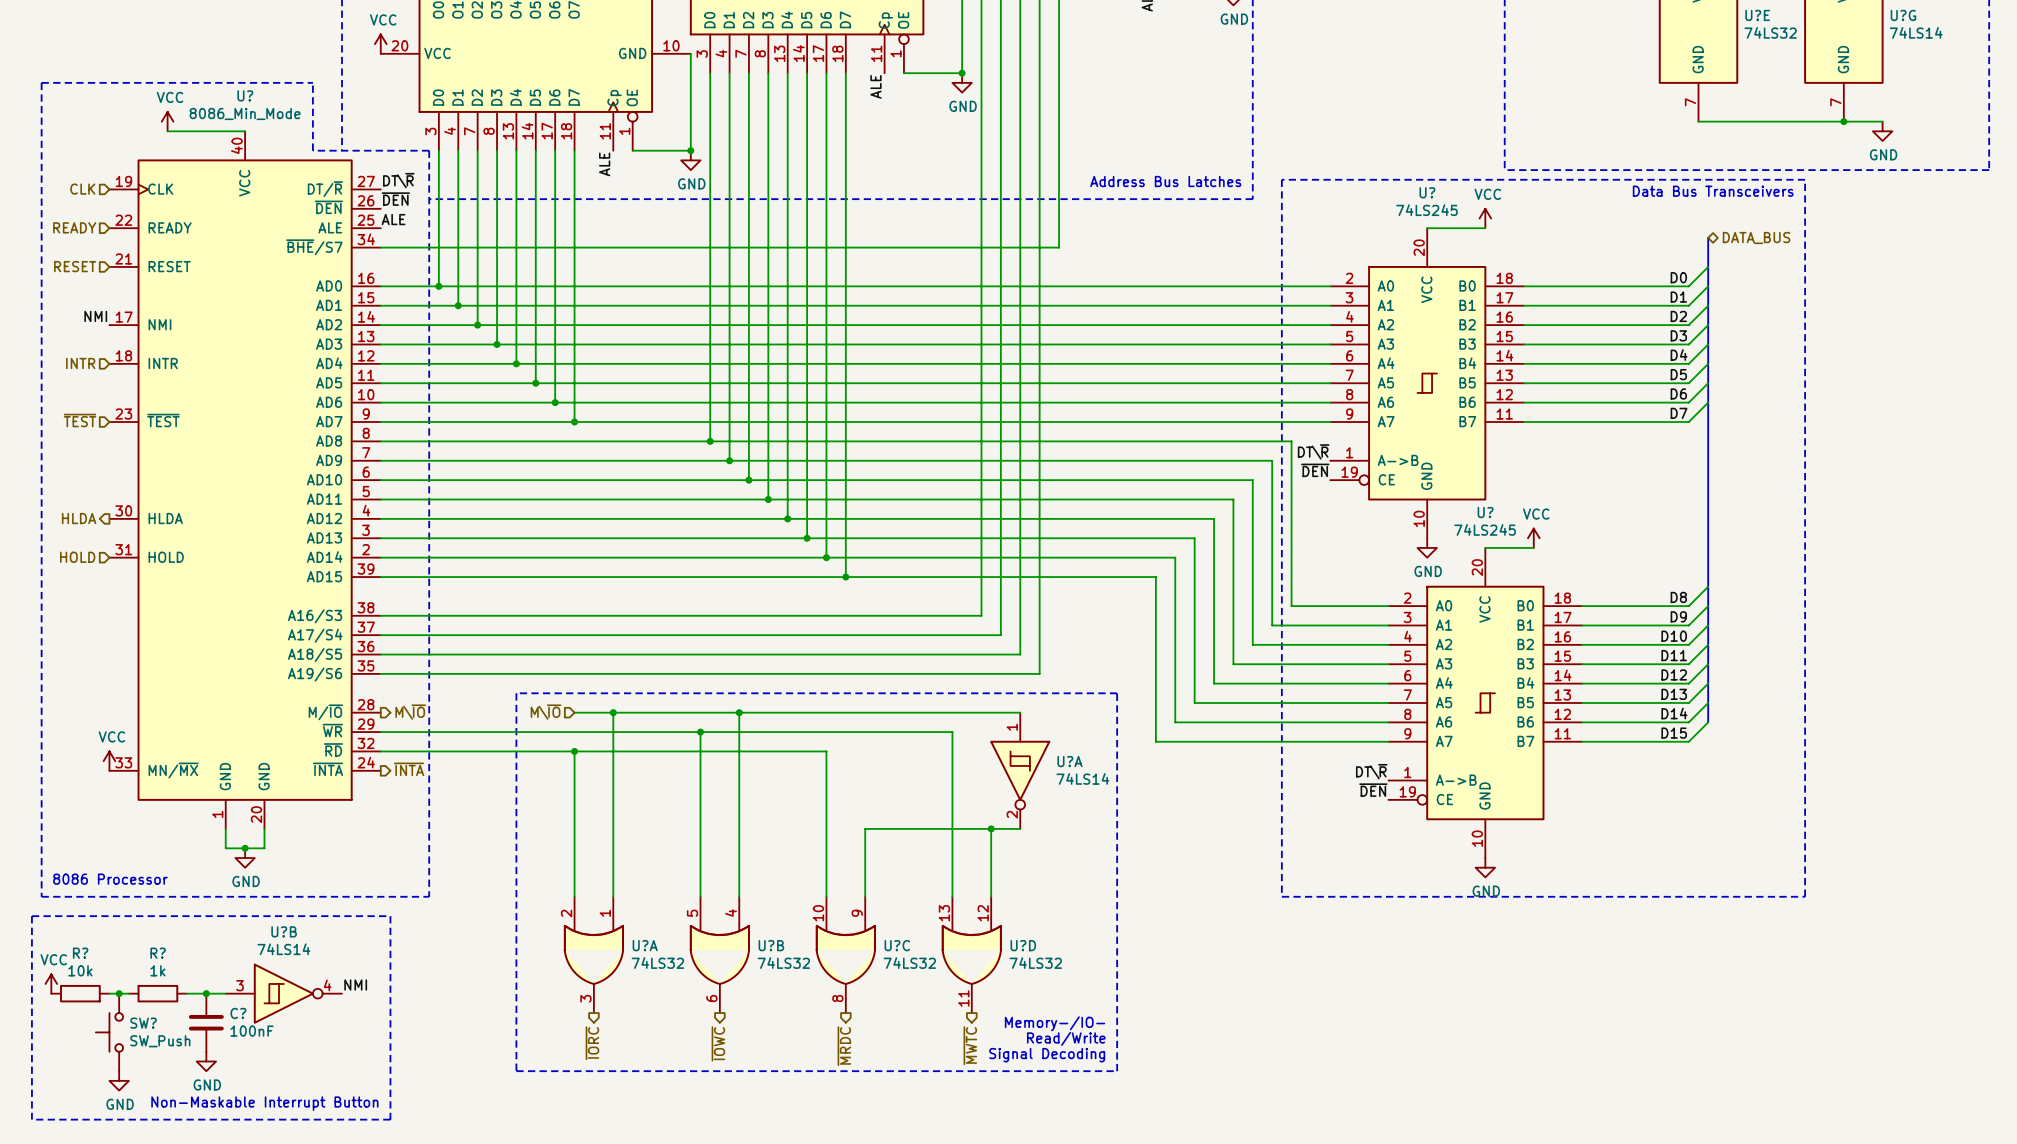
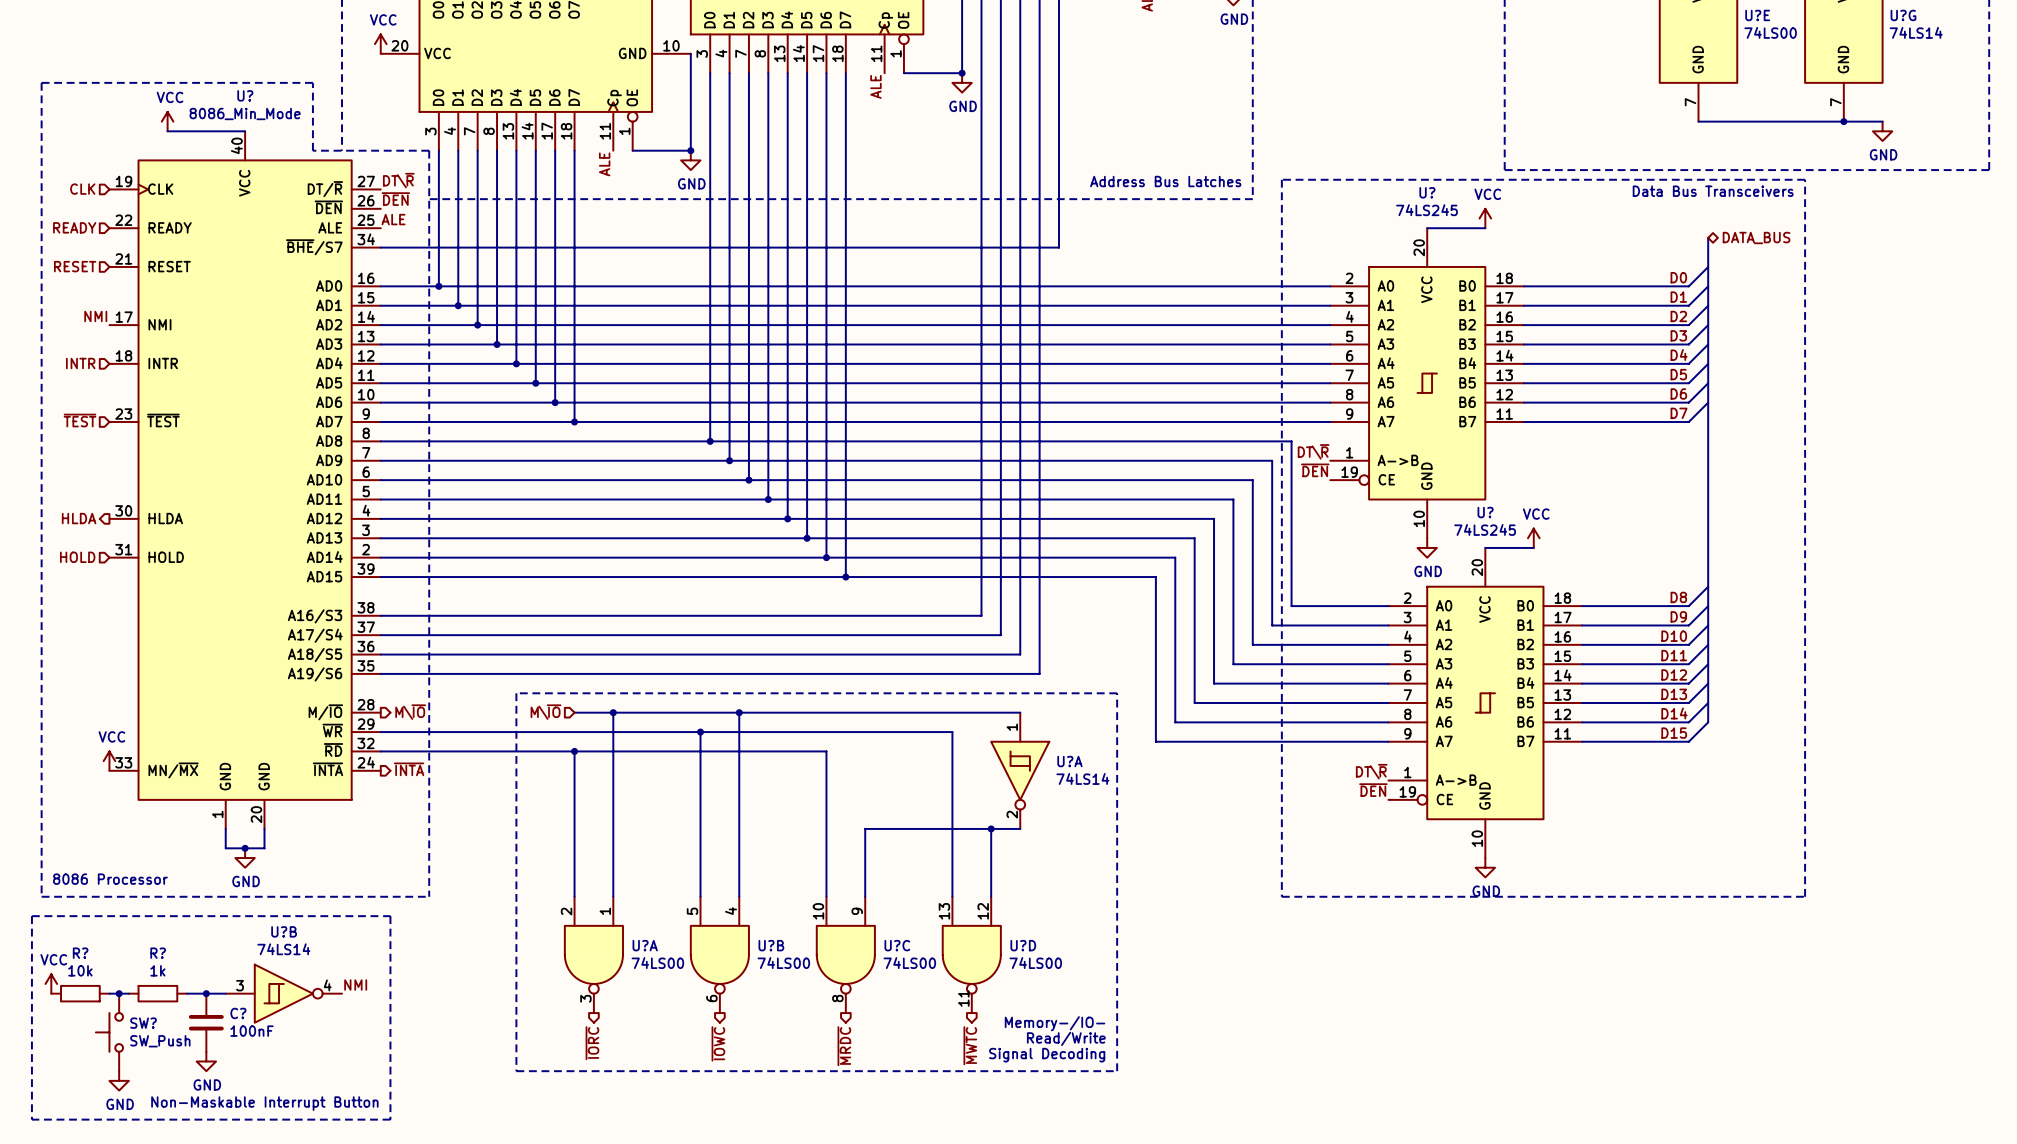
U?E value: 74LS32 (1770, 32) -> 74LS00 (1770, 32)
U?A symbol: [563, 896, 625, 1014] -> [563, 896, 624, 1014]
U?B symbol: [689, 896, 751, 1014] -> [689, 896, 750, 1014]
U?C symbol: [815, 896, 877, 1014] -> [815, 896, 876, 1014]
U?D symbol: [941, 896, 1002, 1014] -> [941, 896, 1002, 1014]
U?A value: 74LS32 (657, 963) -> 74LS00 (657, 963)
U?B value: 74LS32 (783, 963) -> 74LS00 (783, 963)
U?C value: 74LS32 (909, 963) -> 74LS00 (909, 963)
U?D value: 74LS32 (1035, 963) -> 74LS00 (1035, 963)

